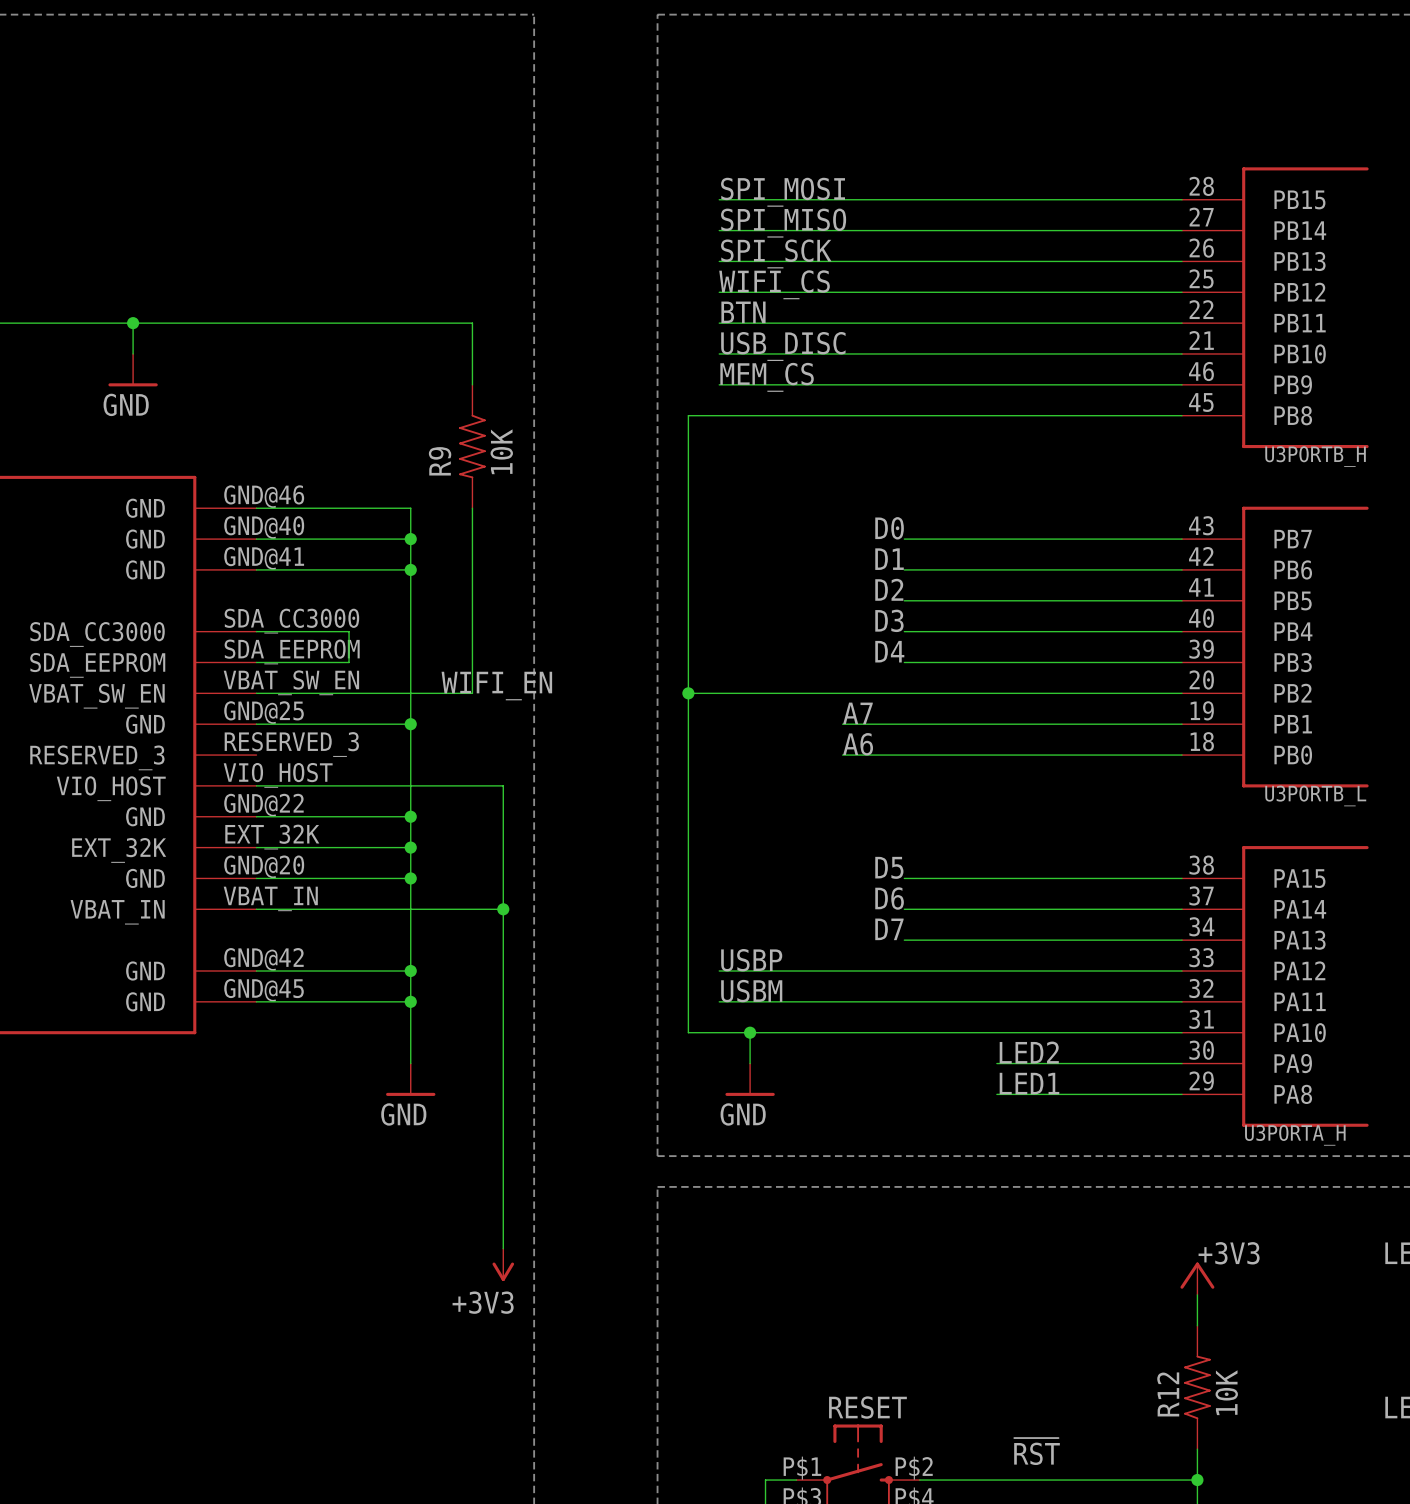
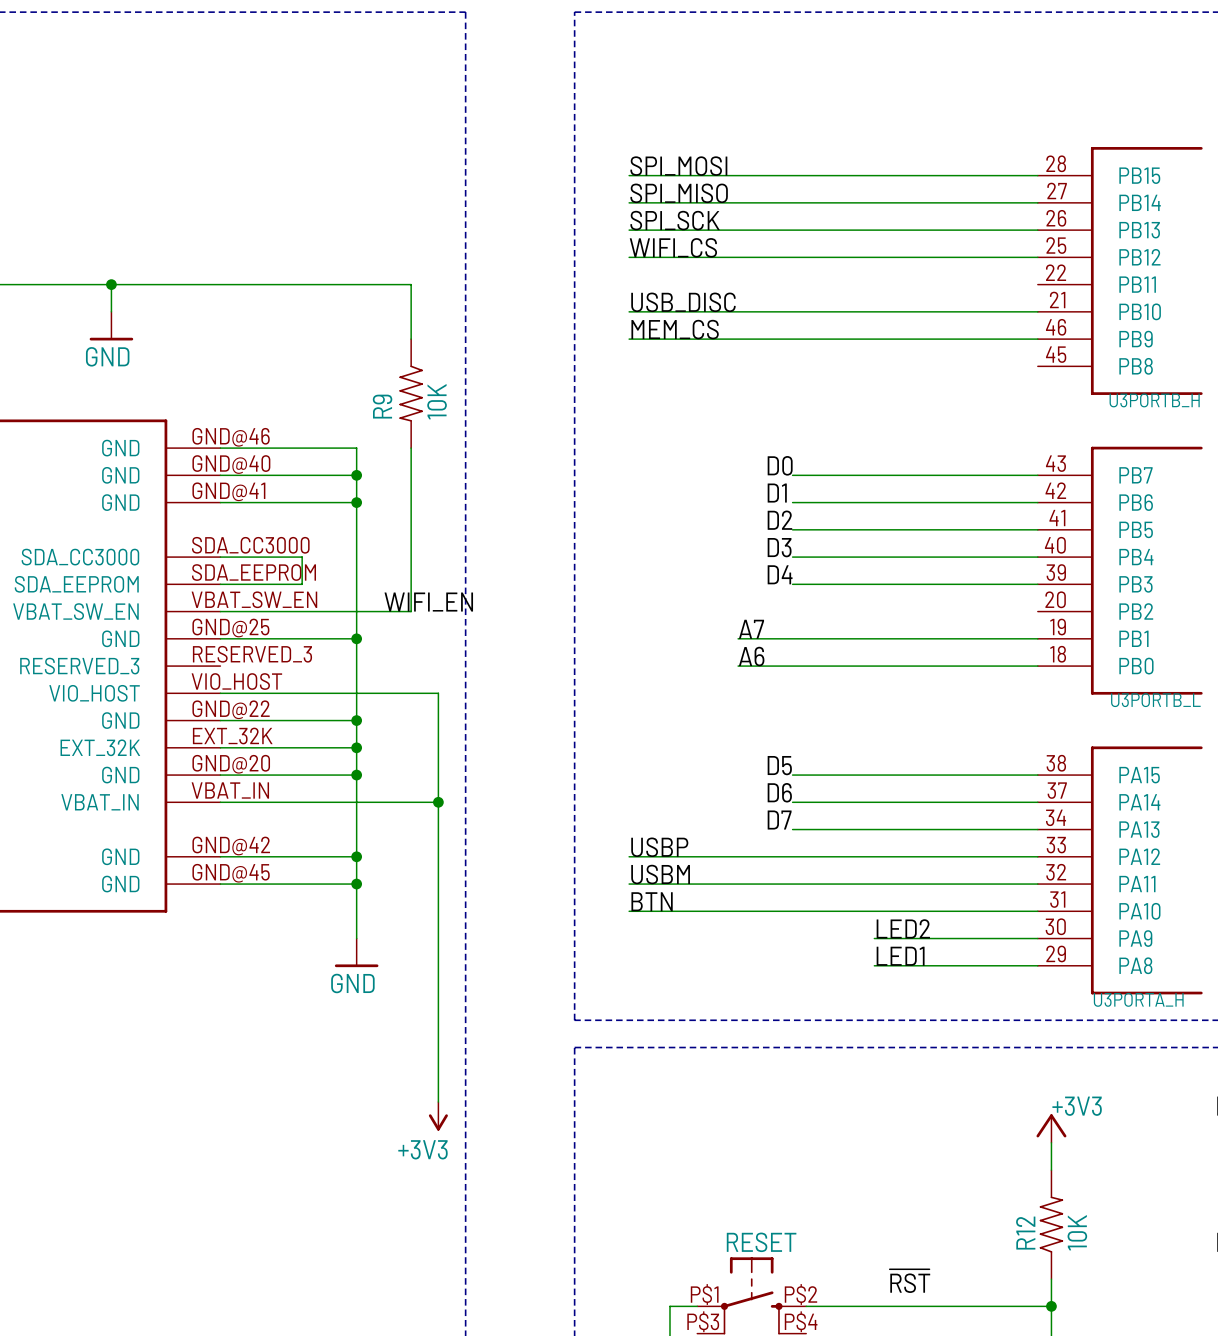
label: BTN (743, 312) -> none
wire: (719, 323) (1181, 323) -> none
wire: (1181, 415) (688, 415) (688, 1032) (719, 1032) -> none
wire: (688, 693) (1181, 693) -> none
junction: (688, 693) -> none
label: none -> BTN (652, 901)
wire: (750, 1032) (750, 1063) -> none
junction: (750, 1032) -> none
power symbol: GND (750, 1079) -> none

